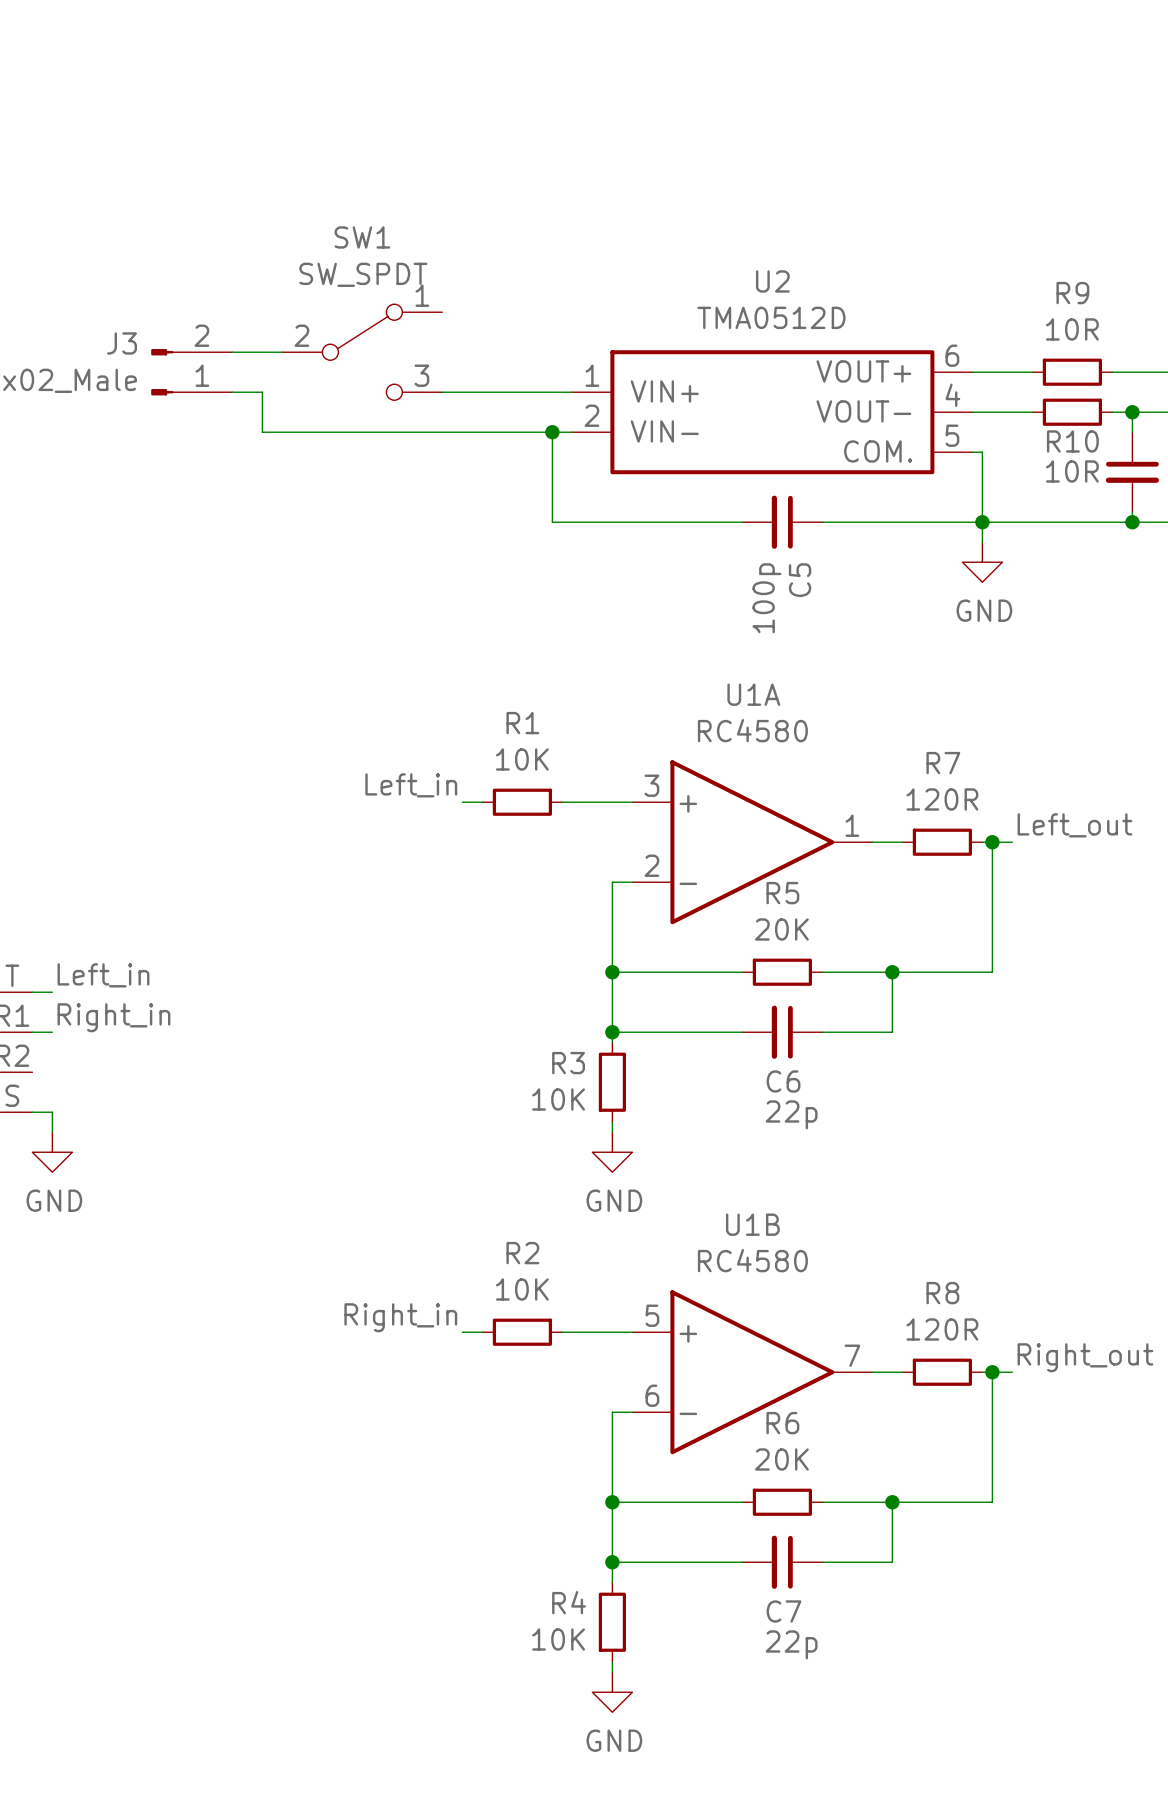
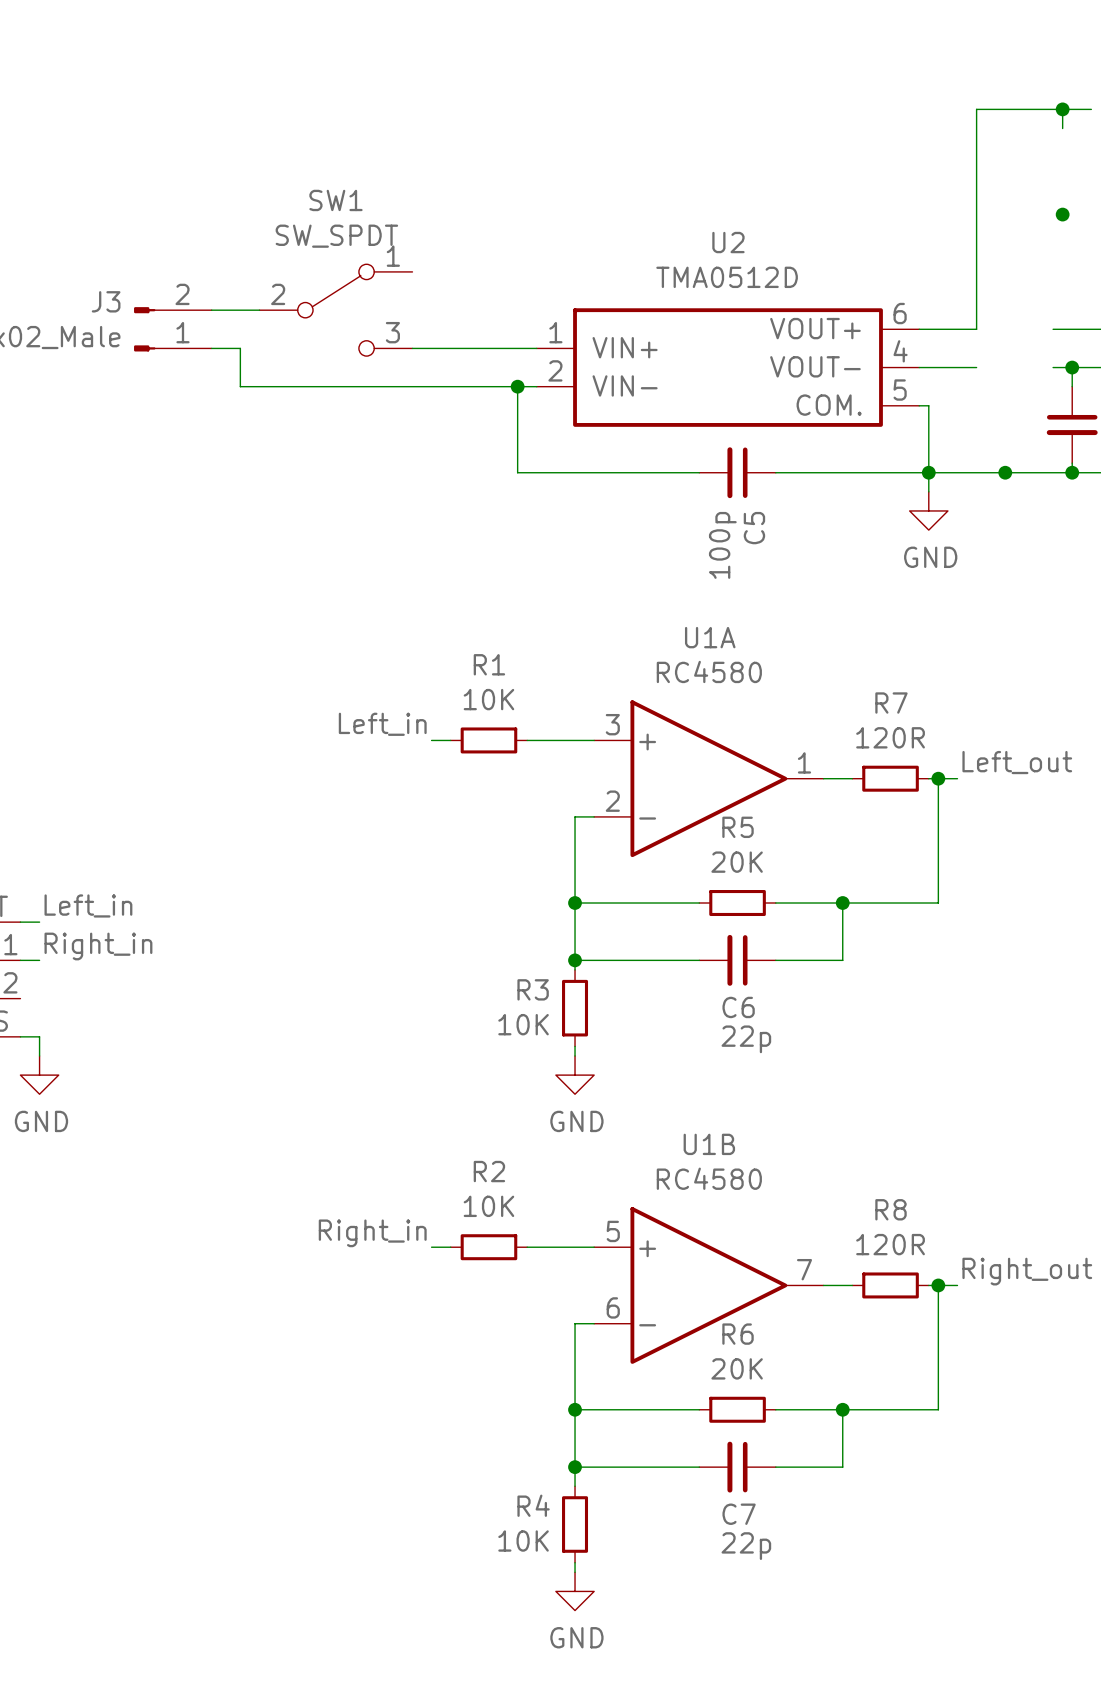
wire: none -> (1062, 109) (1062, 128)
junction: none -> (1062, 109)
wire: none -> (1091, 109) (976, 109) (976, 329)
junction: none -> (1062, 214)
R9: 10R (1072, 372) -> none
R10: 10R (1072, 412) -> none
junction: none -> (1005, 472)

